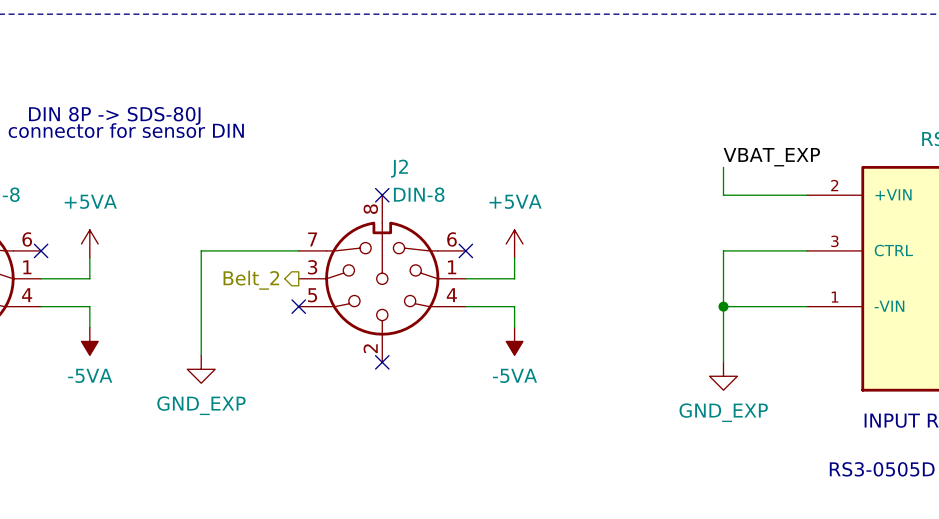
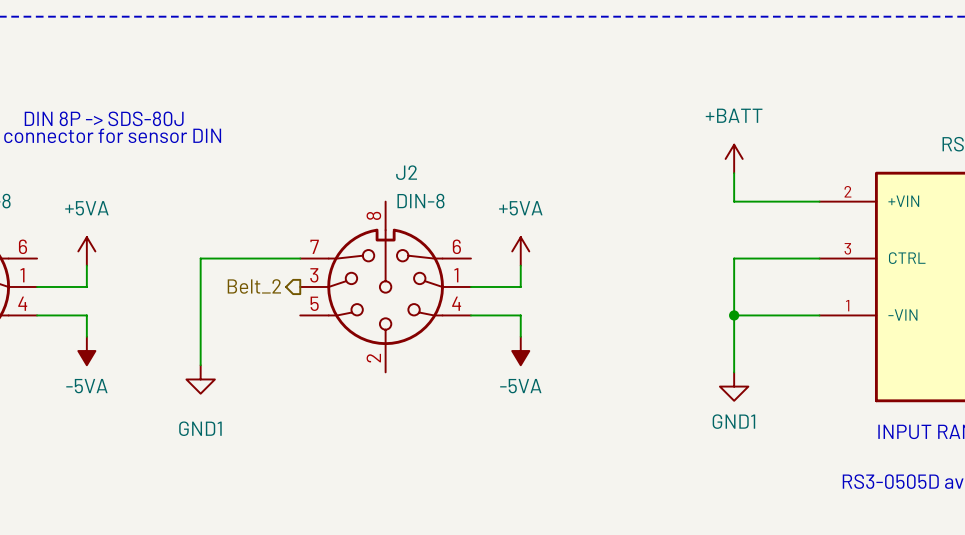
power symbol: none -> +BATT (734, 158)
label: VBAT_EXP (771, 157) -> none
no-connect mark: (382, 195) -> none
no-connect mark: (41, 250) -> none
no-connect mark: (465, 250) -> none
no-connect mark: (298, 306) -> none
no-connect mark: (382, 362) -> none
power symbol: GND_EXP (201, 369) -> GND1 (200, 379)
power symbol: GND_EXP (723, 376) -> GND1 (734, 386)

